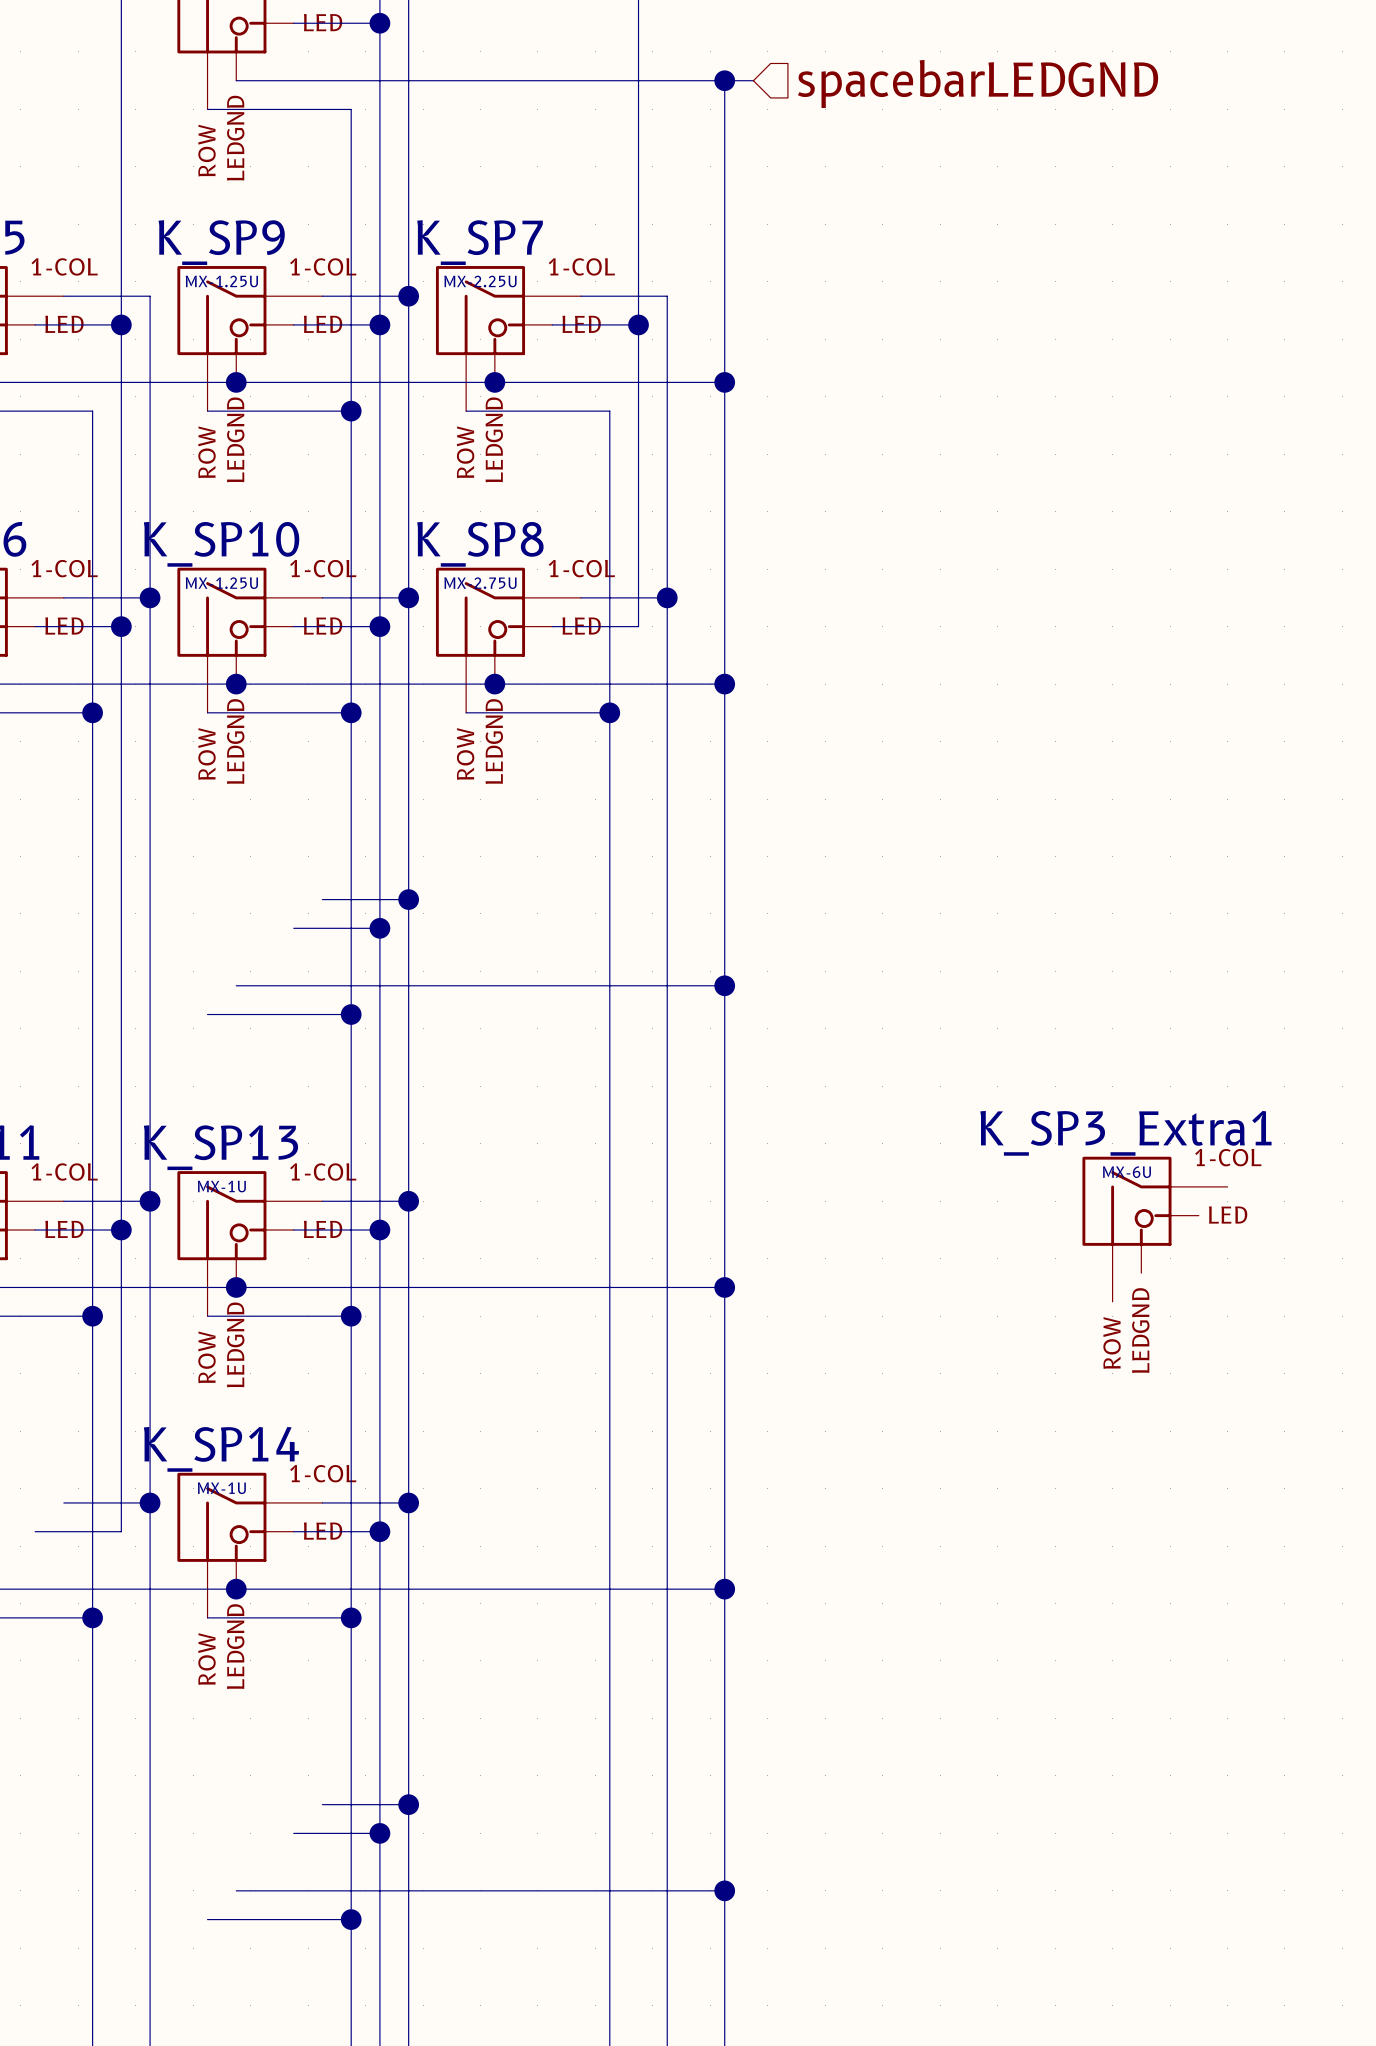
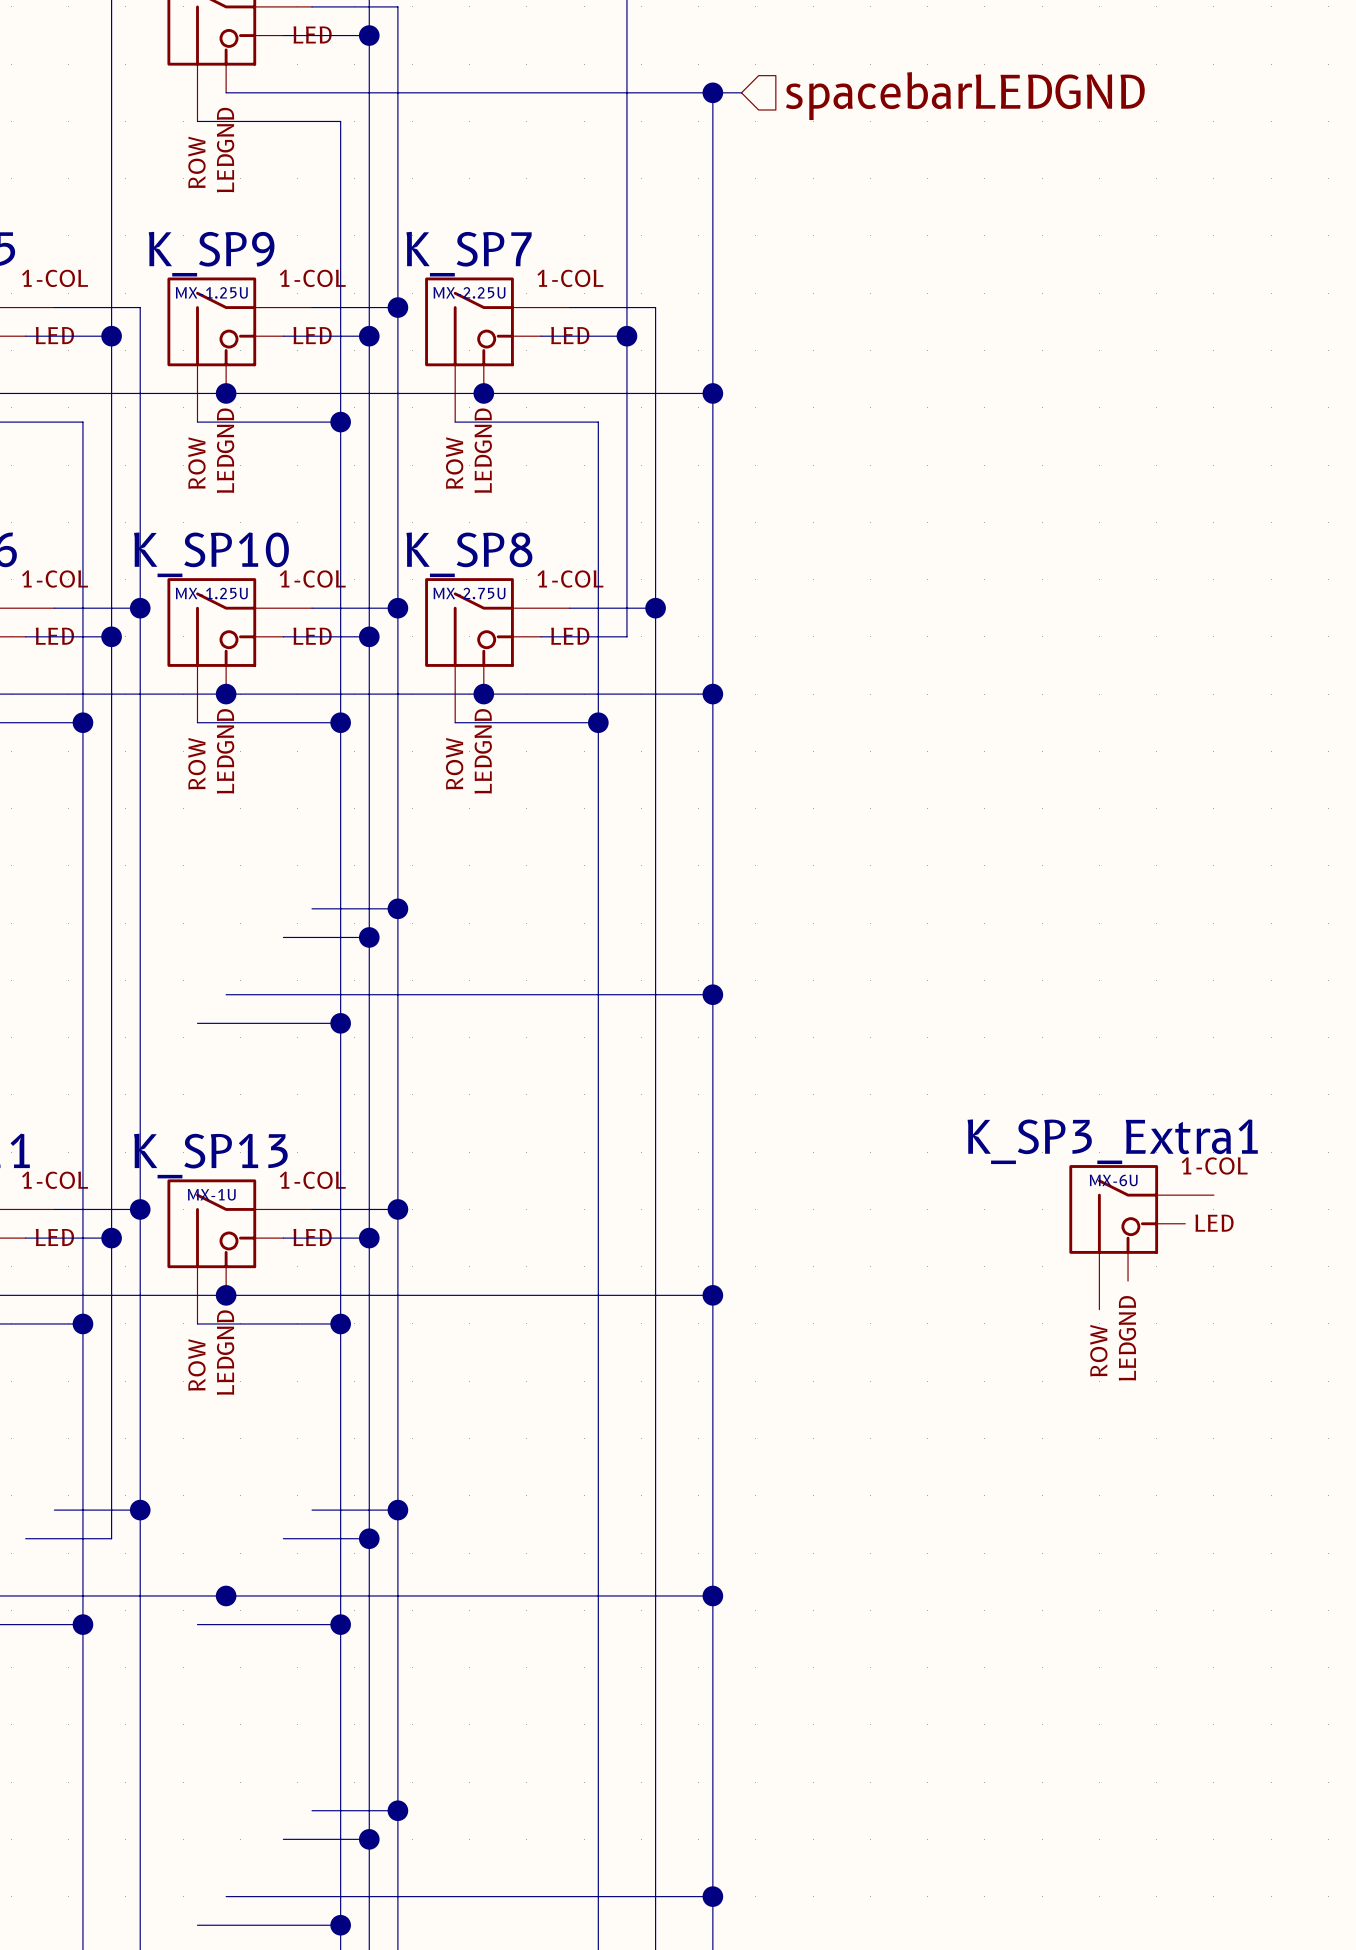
K_SP14: MX-1U (249, 1545) -> none

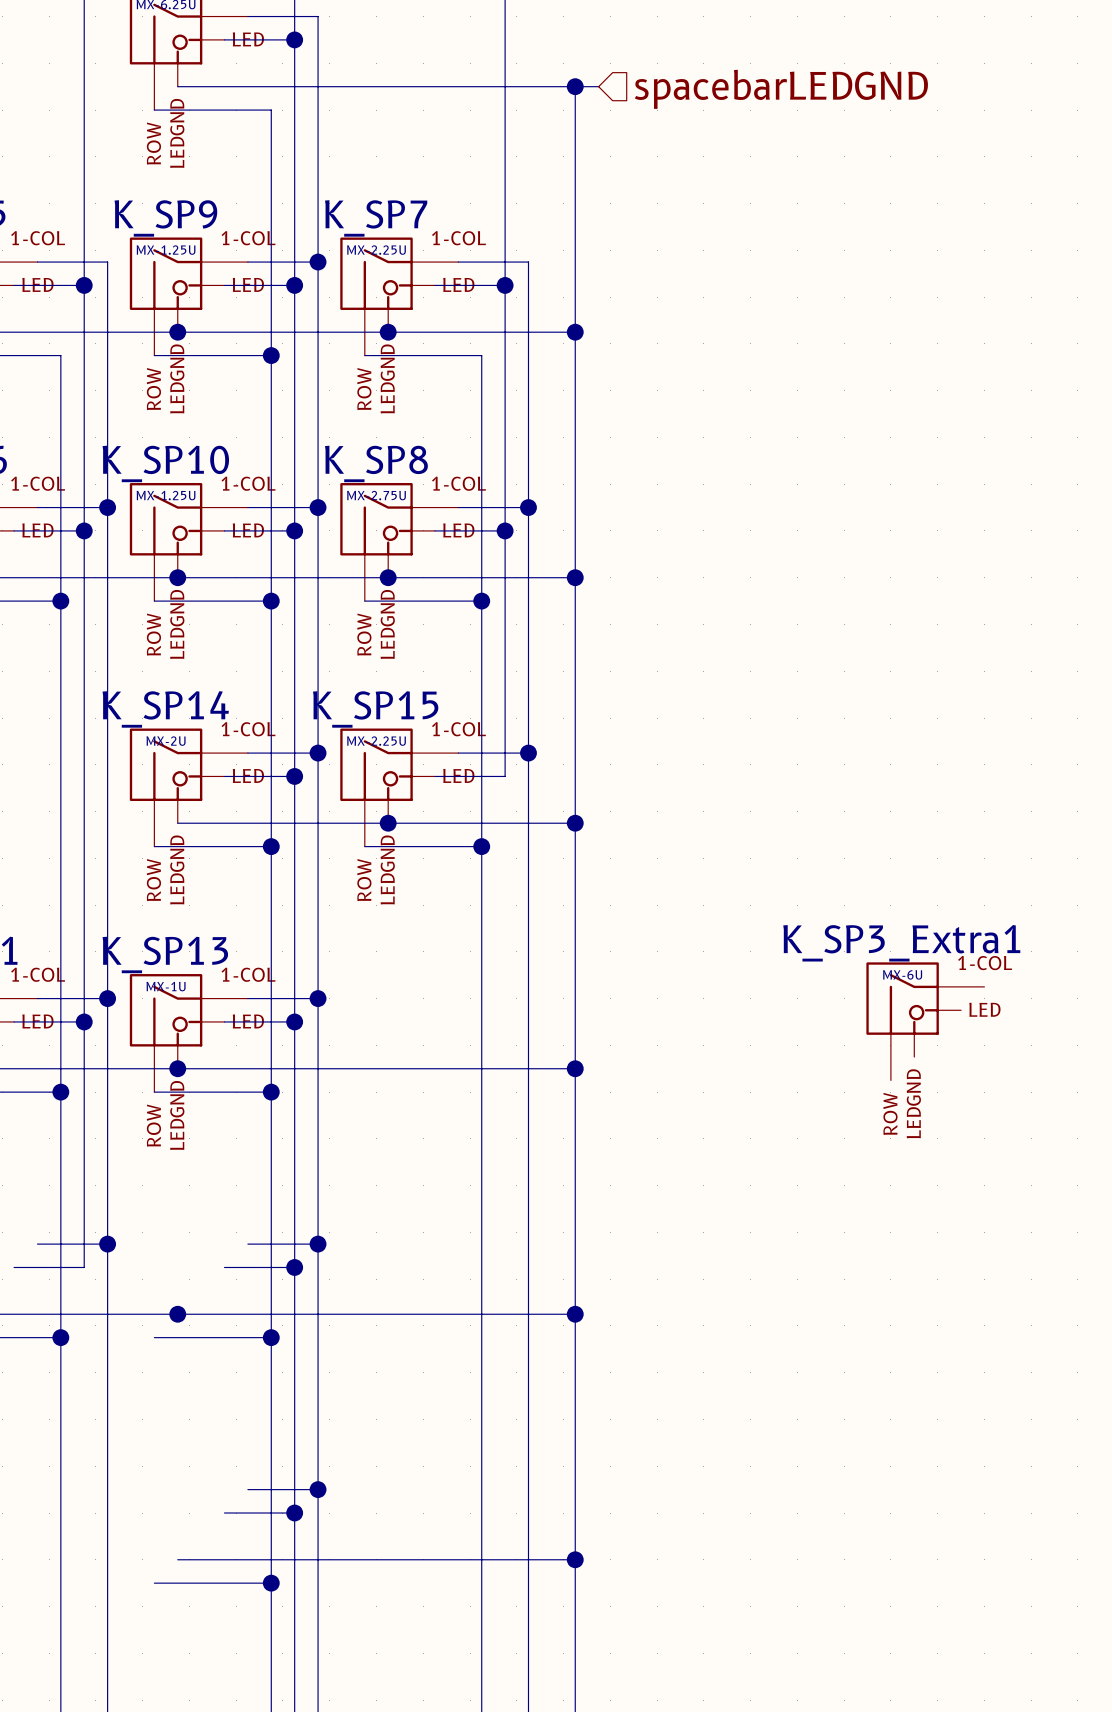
wire: none -> (505, 530) (505, 776) (434, 776)
junction: none -> (505, 530)
wire: none -> (458, 753) (528, 753)
junction: none -> (528, 753)
K_SP14: none -> MX-2U (188, 787)
K_SP15: none -> MX-2.25U (399, 787)
junction: none -> (388, 823)
wire: none -> (364, 846) (481, 846)
junction: none -> (481, 846)

